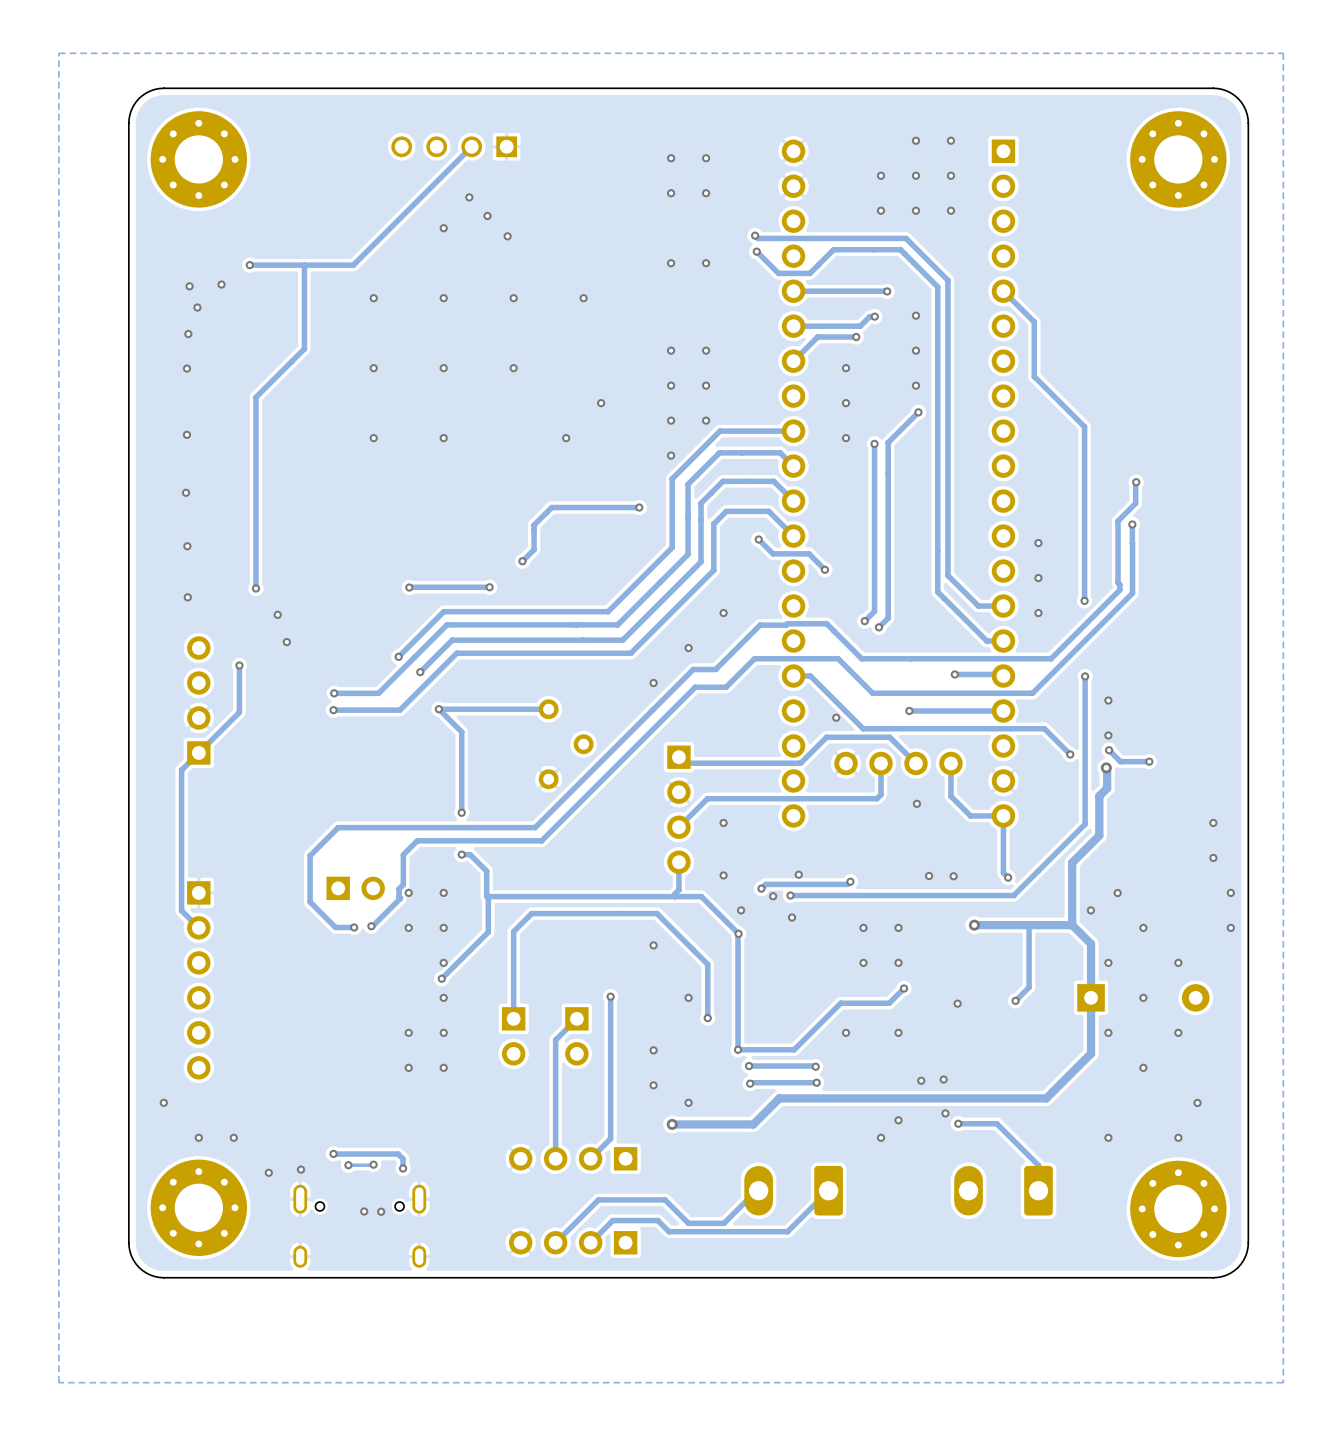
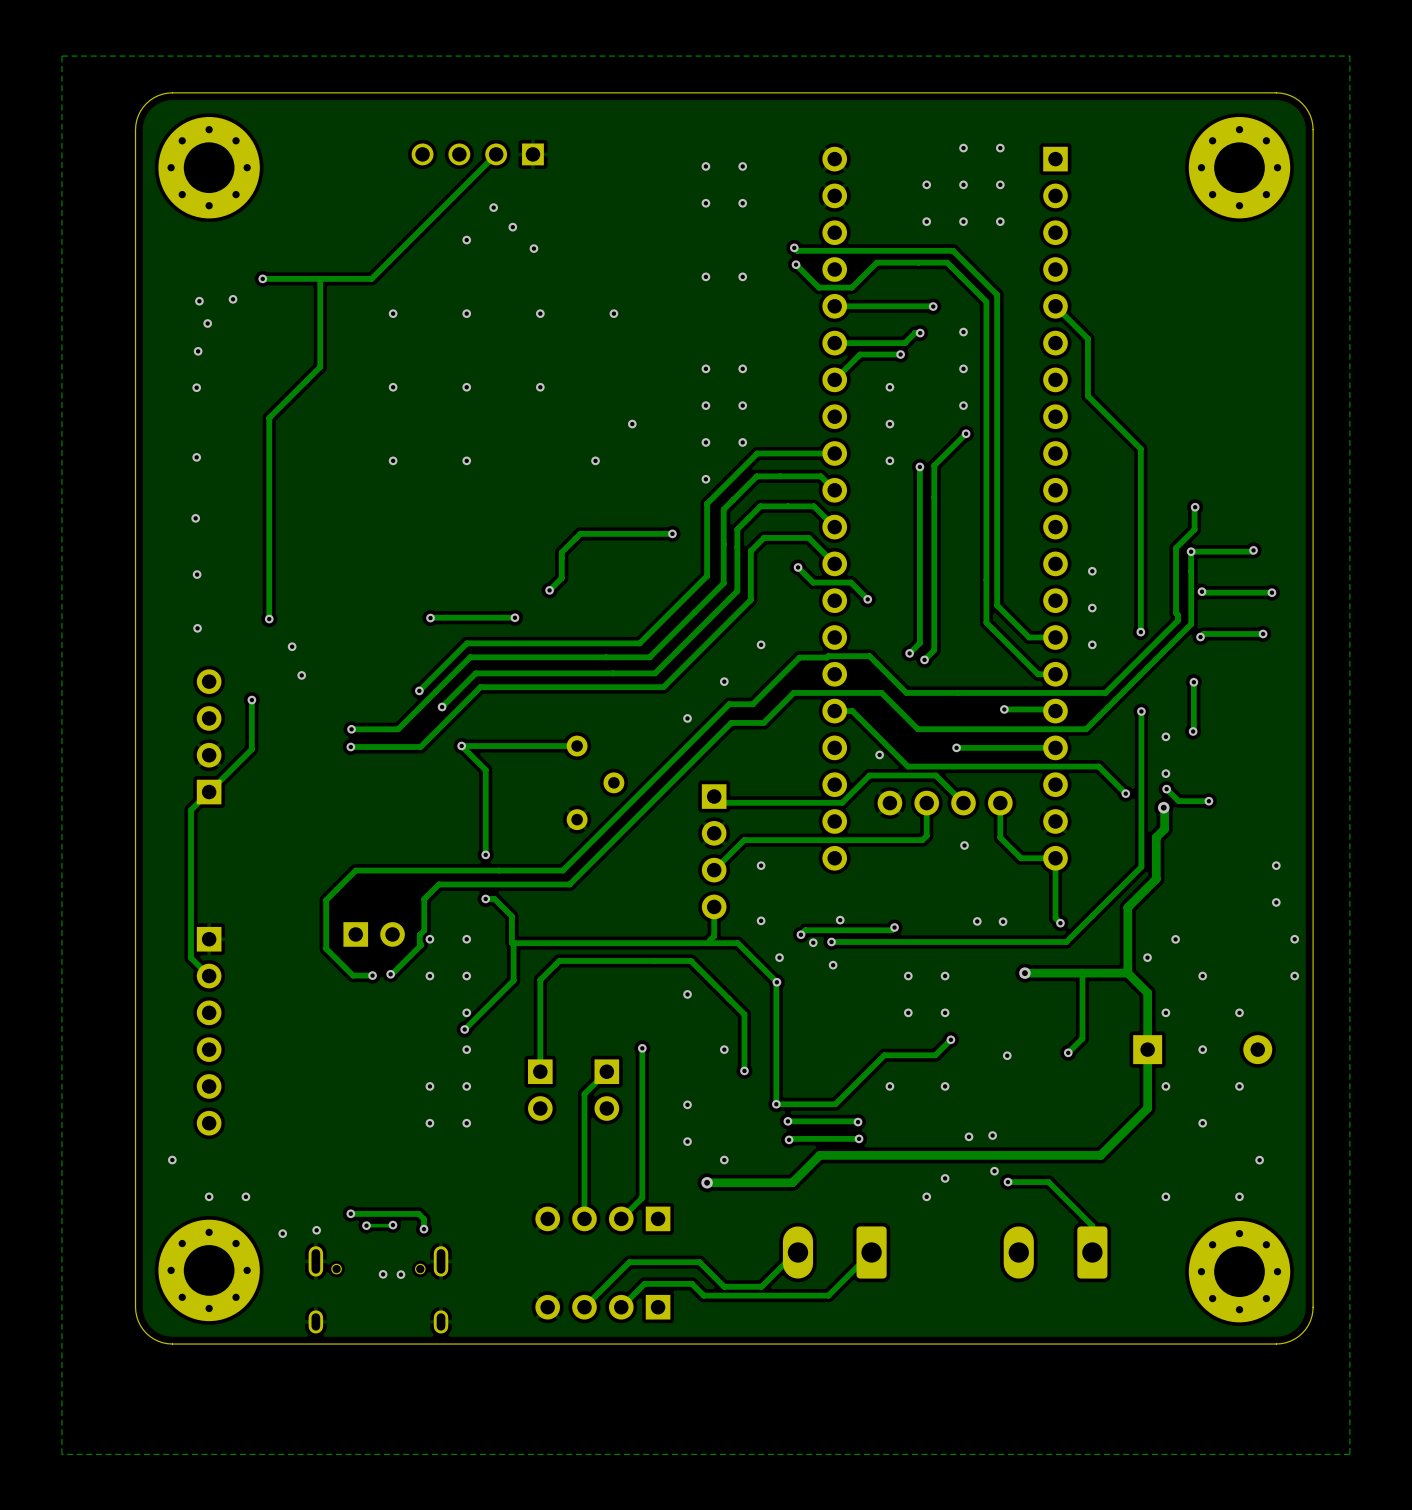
track: none -> (1253, 550) (1191, 551)
via: none -> (1253, 550)
track: none -> (1201, 591) (1271, 592)
via: none -> (1201, 591)
via: none -> (1271, 592)
track: none -> (1263, 633) (1203, 633) (1200, 637)
via: none -> (1263, 633)
via: none -> (1200, 637)
track: none -> (1193, 682) (1193, 731)
via: none -> (1193, 682)
via: none -> (1193, 731)

